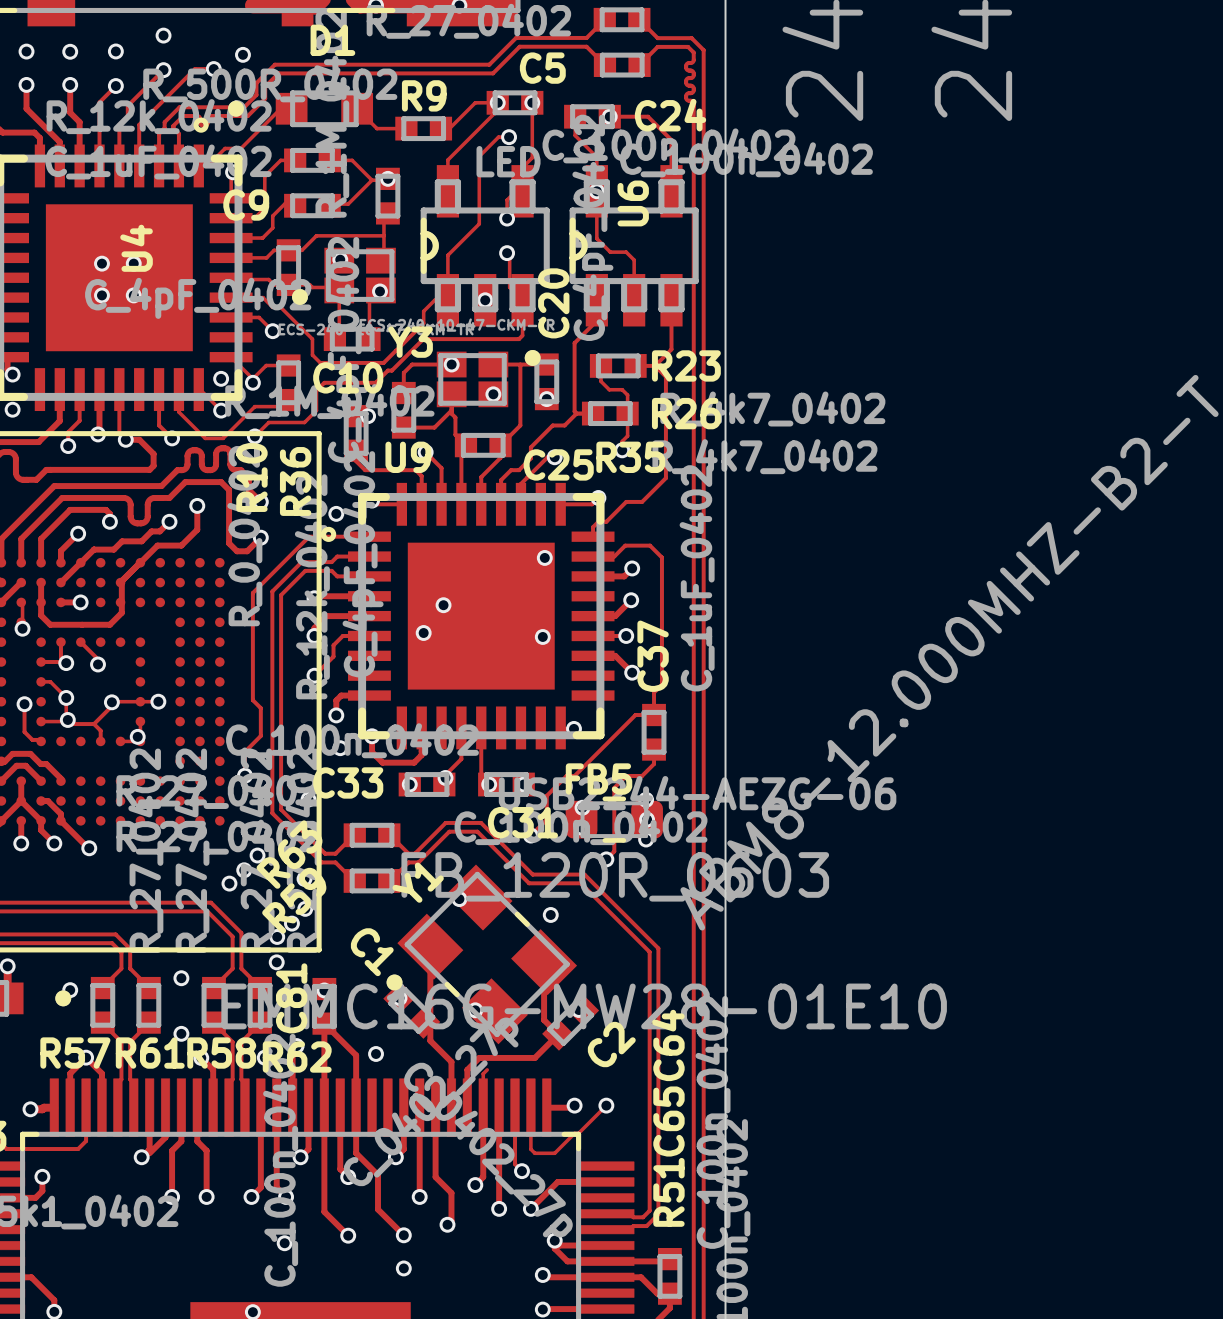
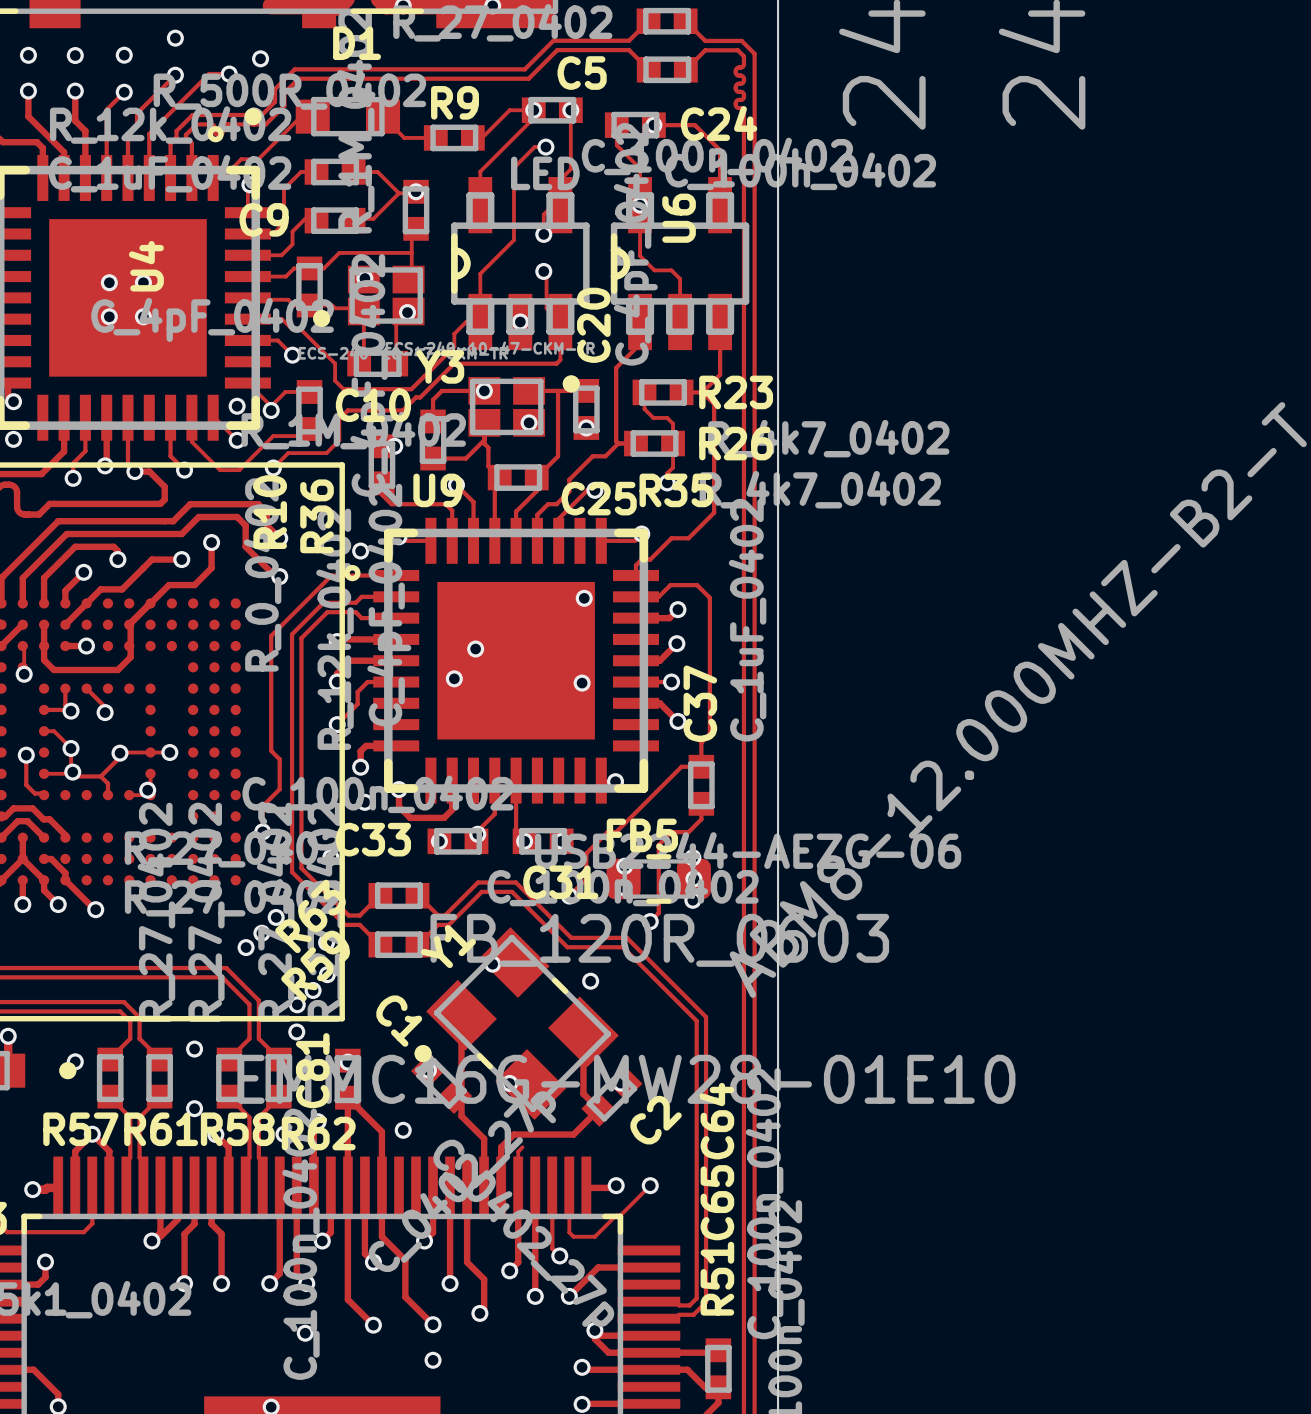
track: (181, 470) (186, 467) (187, 453) (193, 450) (200, 452) (202, 466) (207, 470) -> (194, 504) (222, 504)
track: (210, 470) (215, 467) (216, 451) (221, 448) (229, 451) (230, 466) (236, 470) -> (225, 504) (253, 504)
track: (123, 497) (129, 501) (131, 519) (137, 523) (146, 520) (148, 502) (154, 497) -> (132, 534) (165, 534)
track: (229, 509) (229, 543) (237, 551) (247, 551) (260, 537) -> (245, 546) (275, 576) (279, 576)
track: (169, 521) (159, 531) (151, 531) (141, 541) (122, 541) -> (181, 559) (151, 559) (130, 580)

